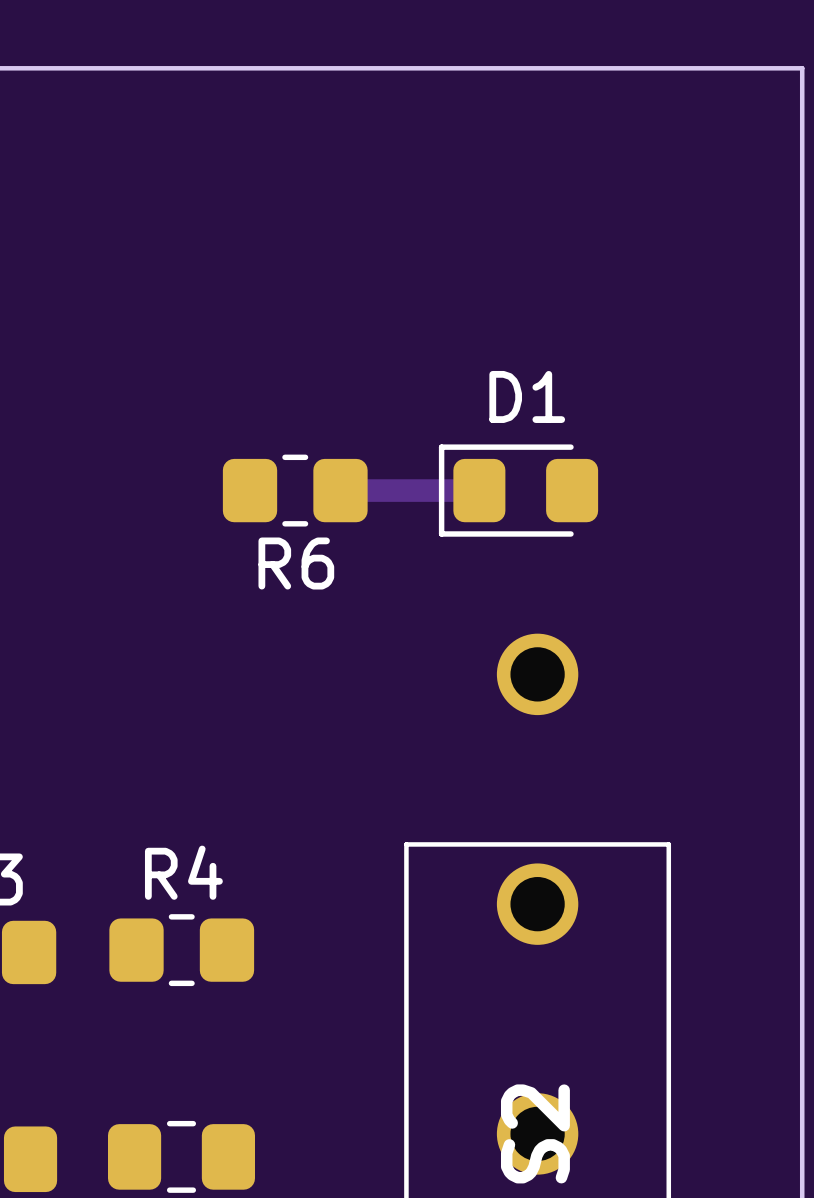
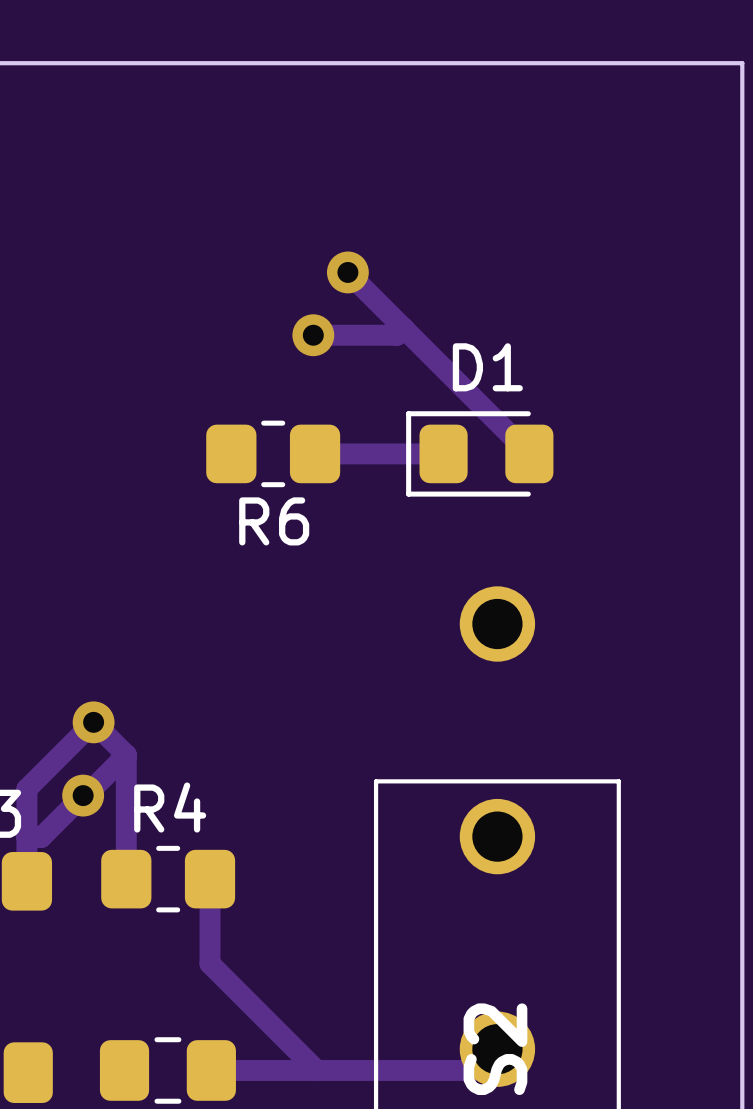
track: none -> (347, 272) (529, 453)
via: none -> (347, 272)
track: none -> (403, 328) (397, 335) (313, 335)
via: none -> (313, 335)
via: none -> (93, 722)
track: none -> (126, 755) (126, 879)
track: none -> (126, 755) (93, 722) (26, 789) (26, 881)
track: none -> (126, 755) (41, 837) (26, 837)
via: none -> (83, 795)
track: none -> (210, 879) (210, 963) (316, 1070)
track: none -> (497, 1049) (476, 1070) (211, 1070)

